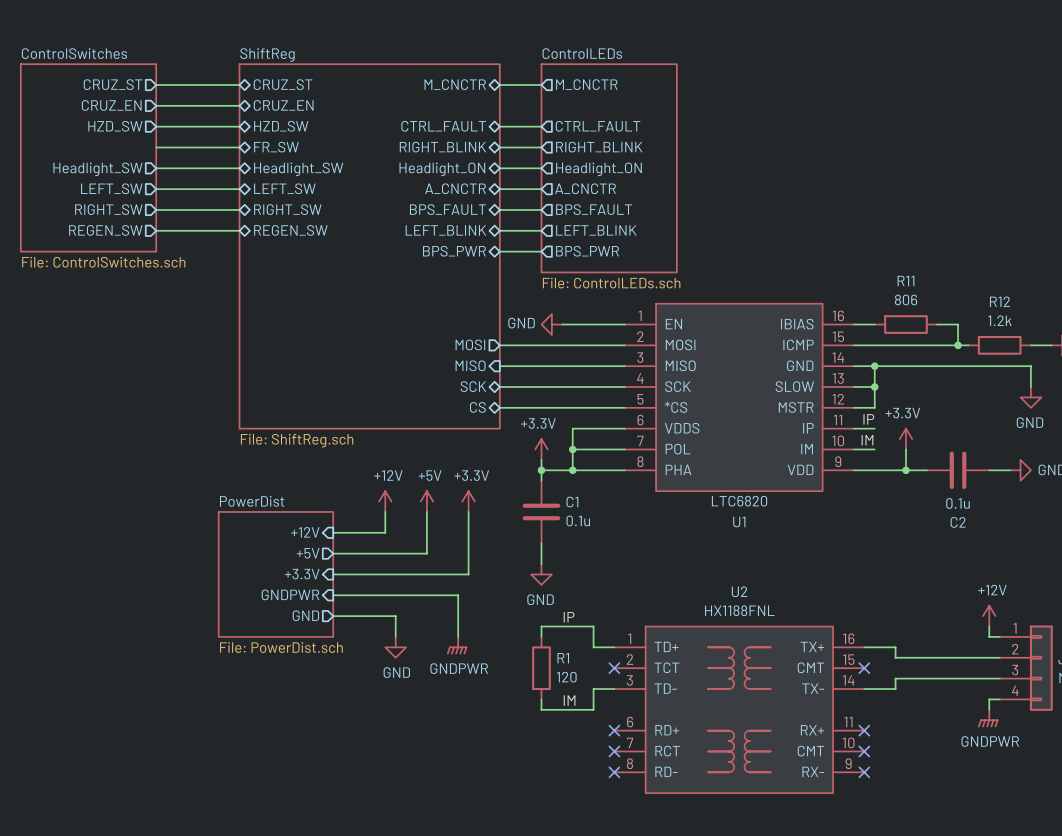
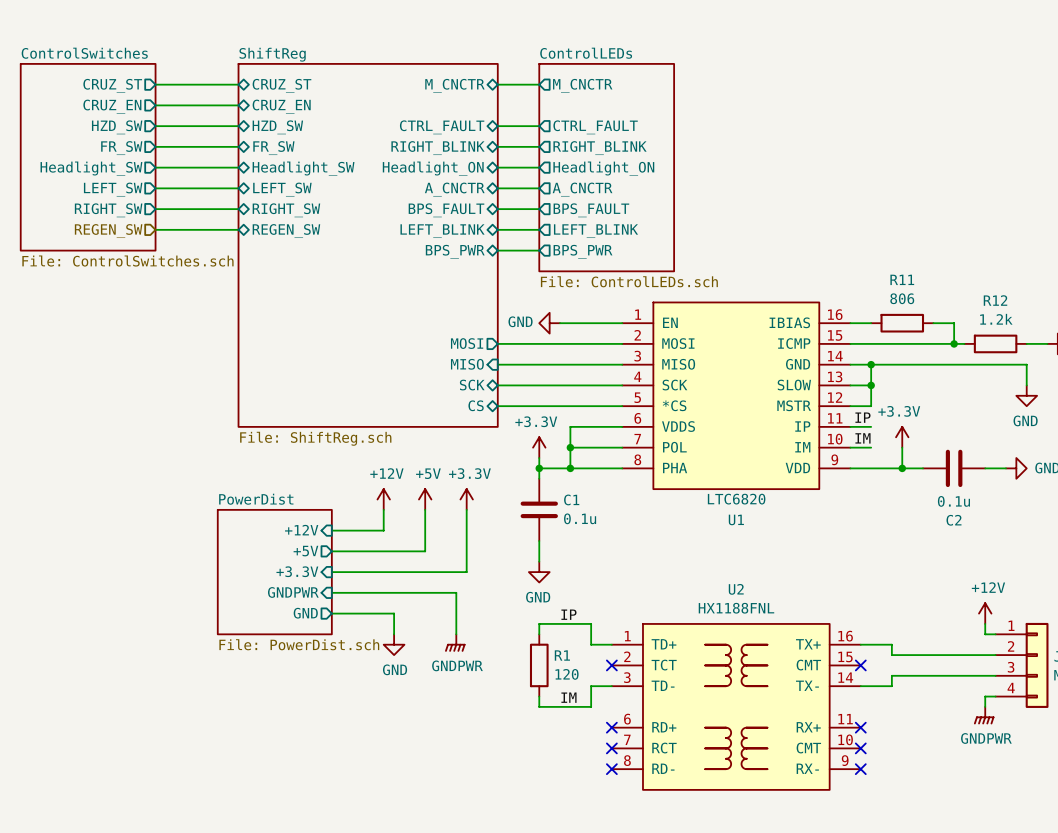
sheet pin: none -> FR_SW (121, 148)
sheet pin: REGEN_SW (105, 230) -> none
hierarchical label: none -> REGEN_SW (108, 231)

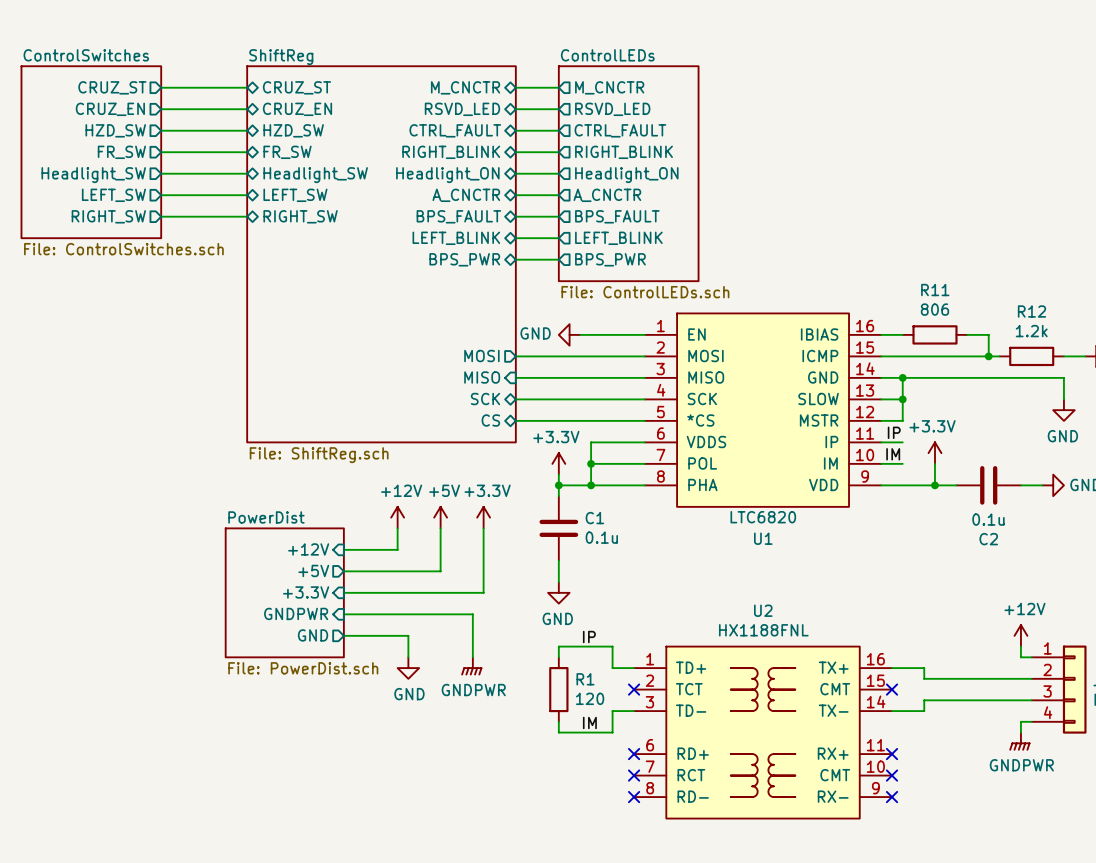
wire: none -> (515, 109) (558, 109)
sheet pin: none -> RSVD_LED (462, 109)
sheet pin: none -> RSVD_LED (612, 109)
sheet ControlSwitches: none -> File: ControlSwitches.sch (91, 152)
sheet ControlSwitches: File: ControlSwitches.sch (88, 157) -> none
wire: (155, 229) (238, 229) -> none
hierarchical label: REGEN_SW (108, 231) -> none
sheet pin: REGEN_SW (286, 231) -> none

